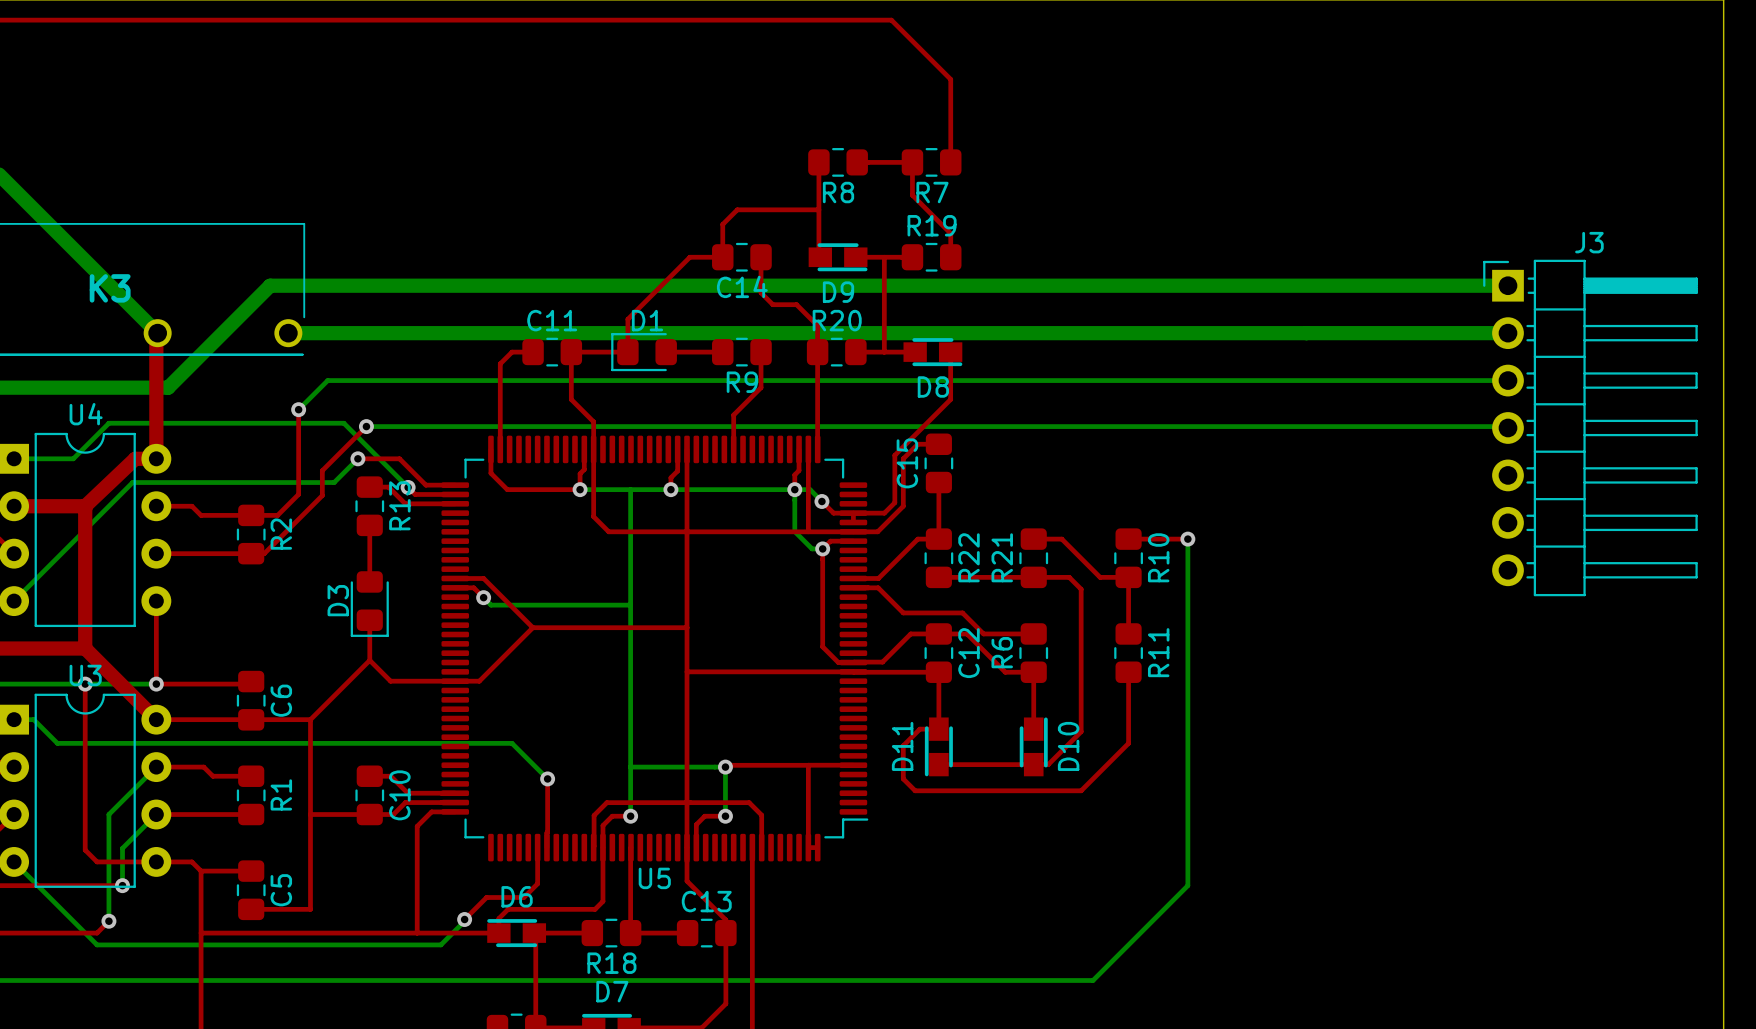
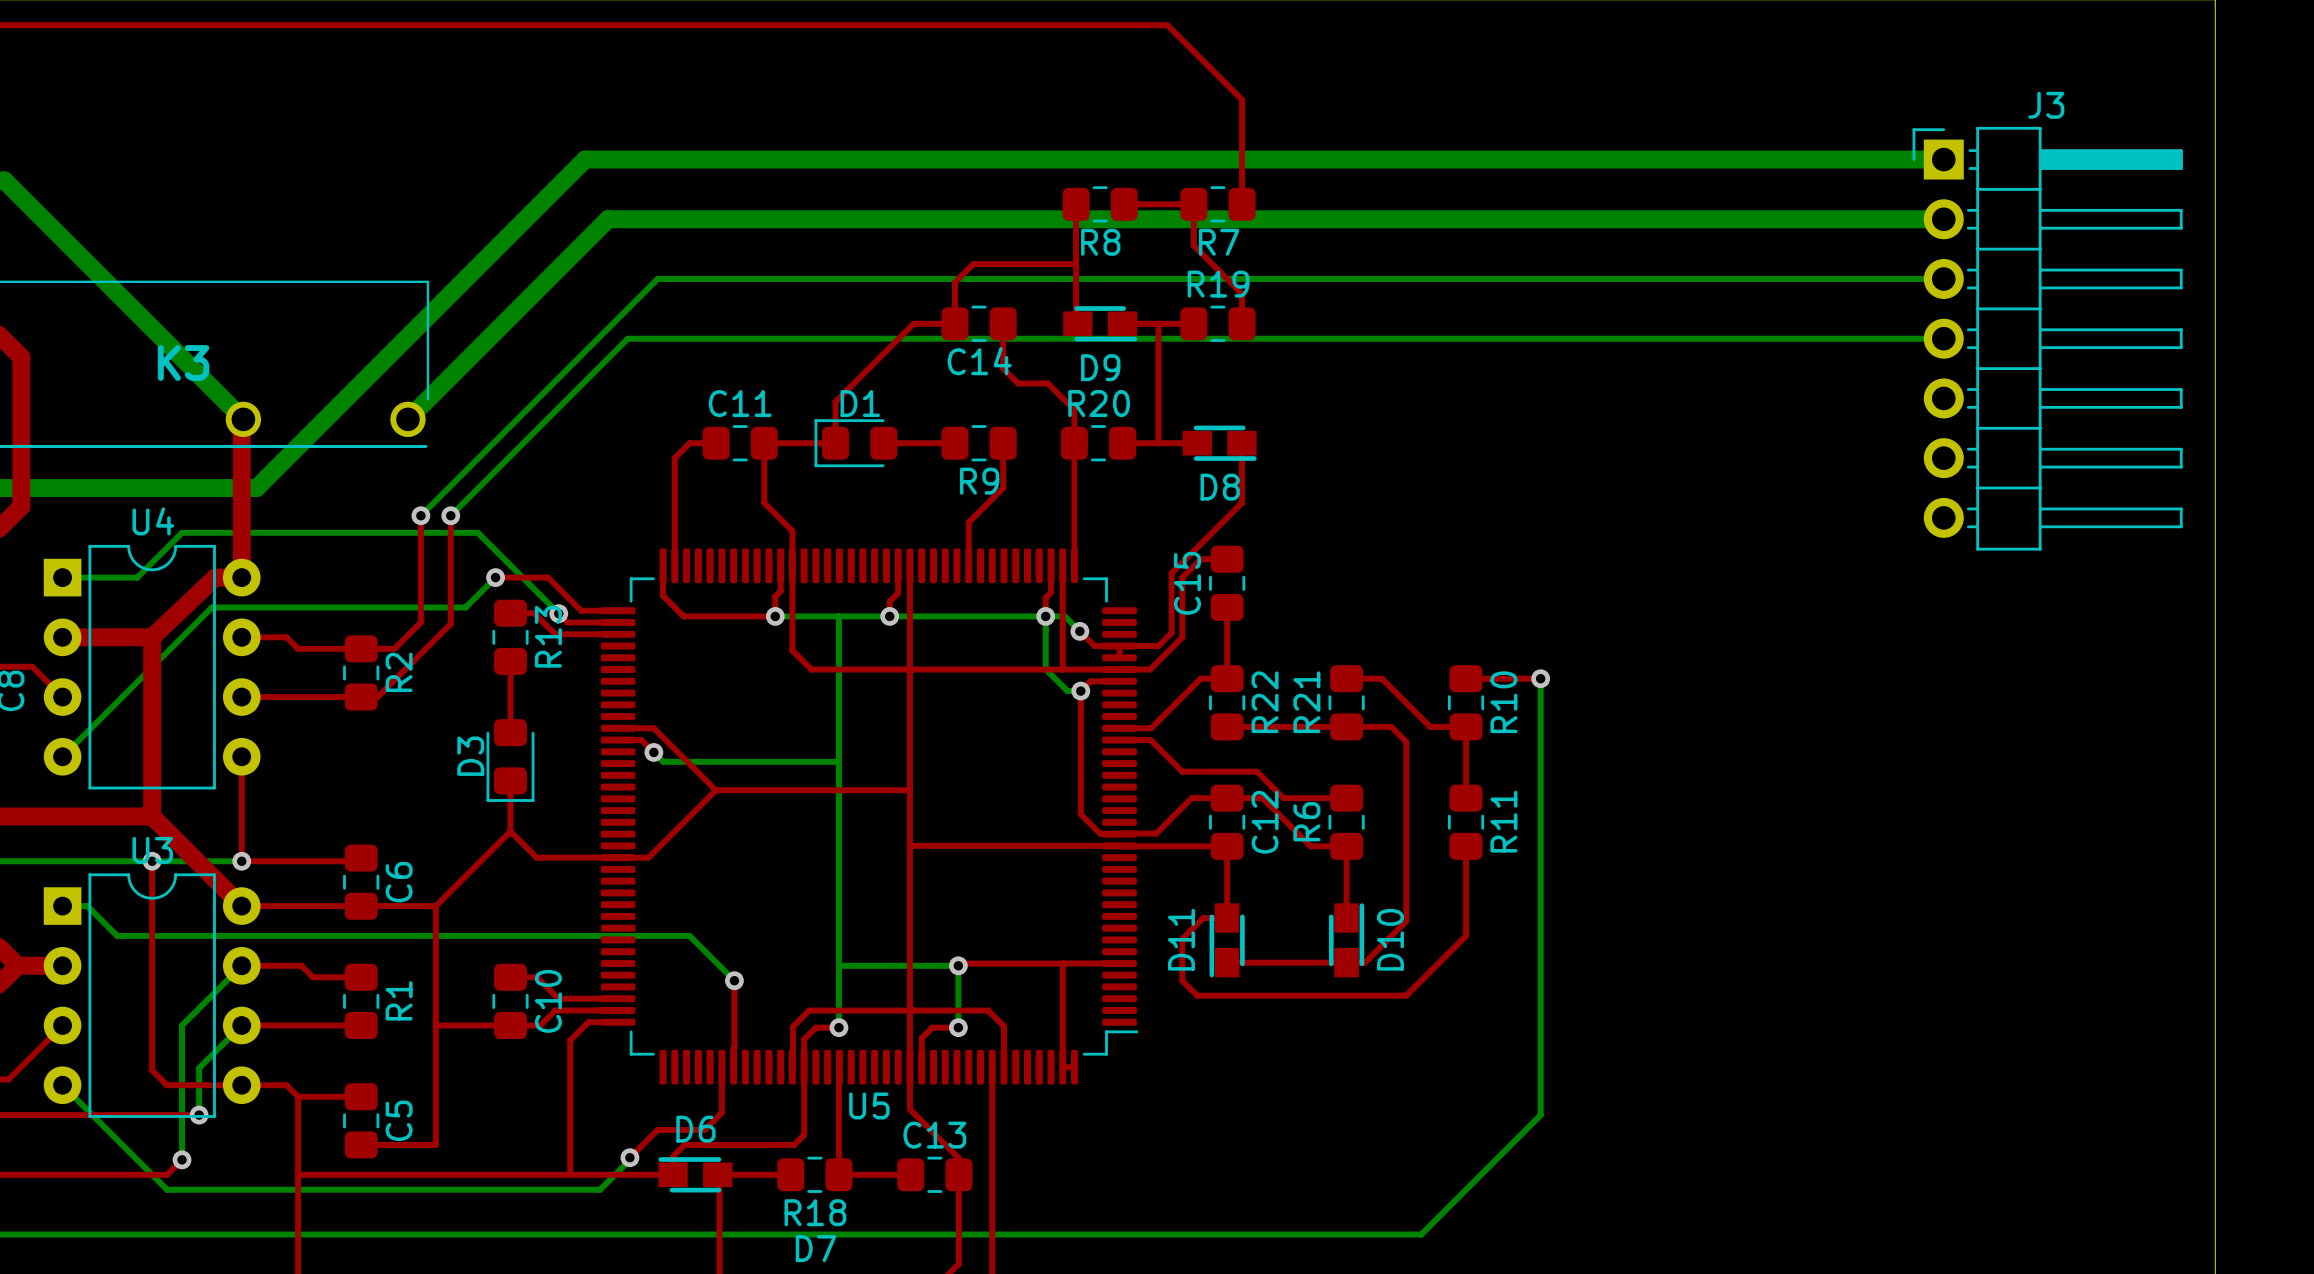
bottom track: none -> (1943, 338) (627, 338) (450, 515)
bottom track: (270, 285) (1507, 285) -> (385, 359) (585, 159) (1943, 159)
bottom track: (288, 333) (1507, 333) -> (407, 419) (608, 219) (1943, 219)
bottom track: (327, 380) (1507, 380) -> (457, 479) (657, 279) (1943, 279)
bottom track: (366, 426) (1507, 427) -> none
top track: (366, 426) (322, 470) -> (450, 515) (450, 592)
via position: (366, 426) -> (450, 515)
J3 position: (1590, 427) -> (2047, 338)

